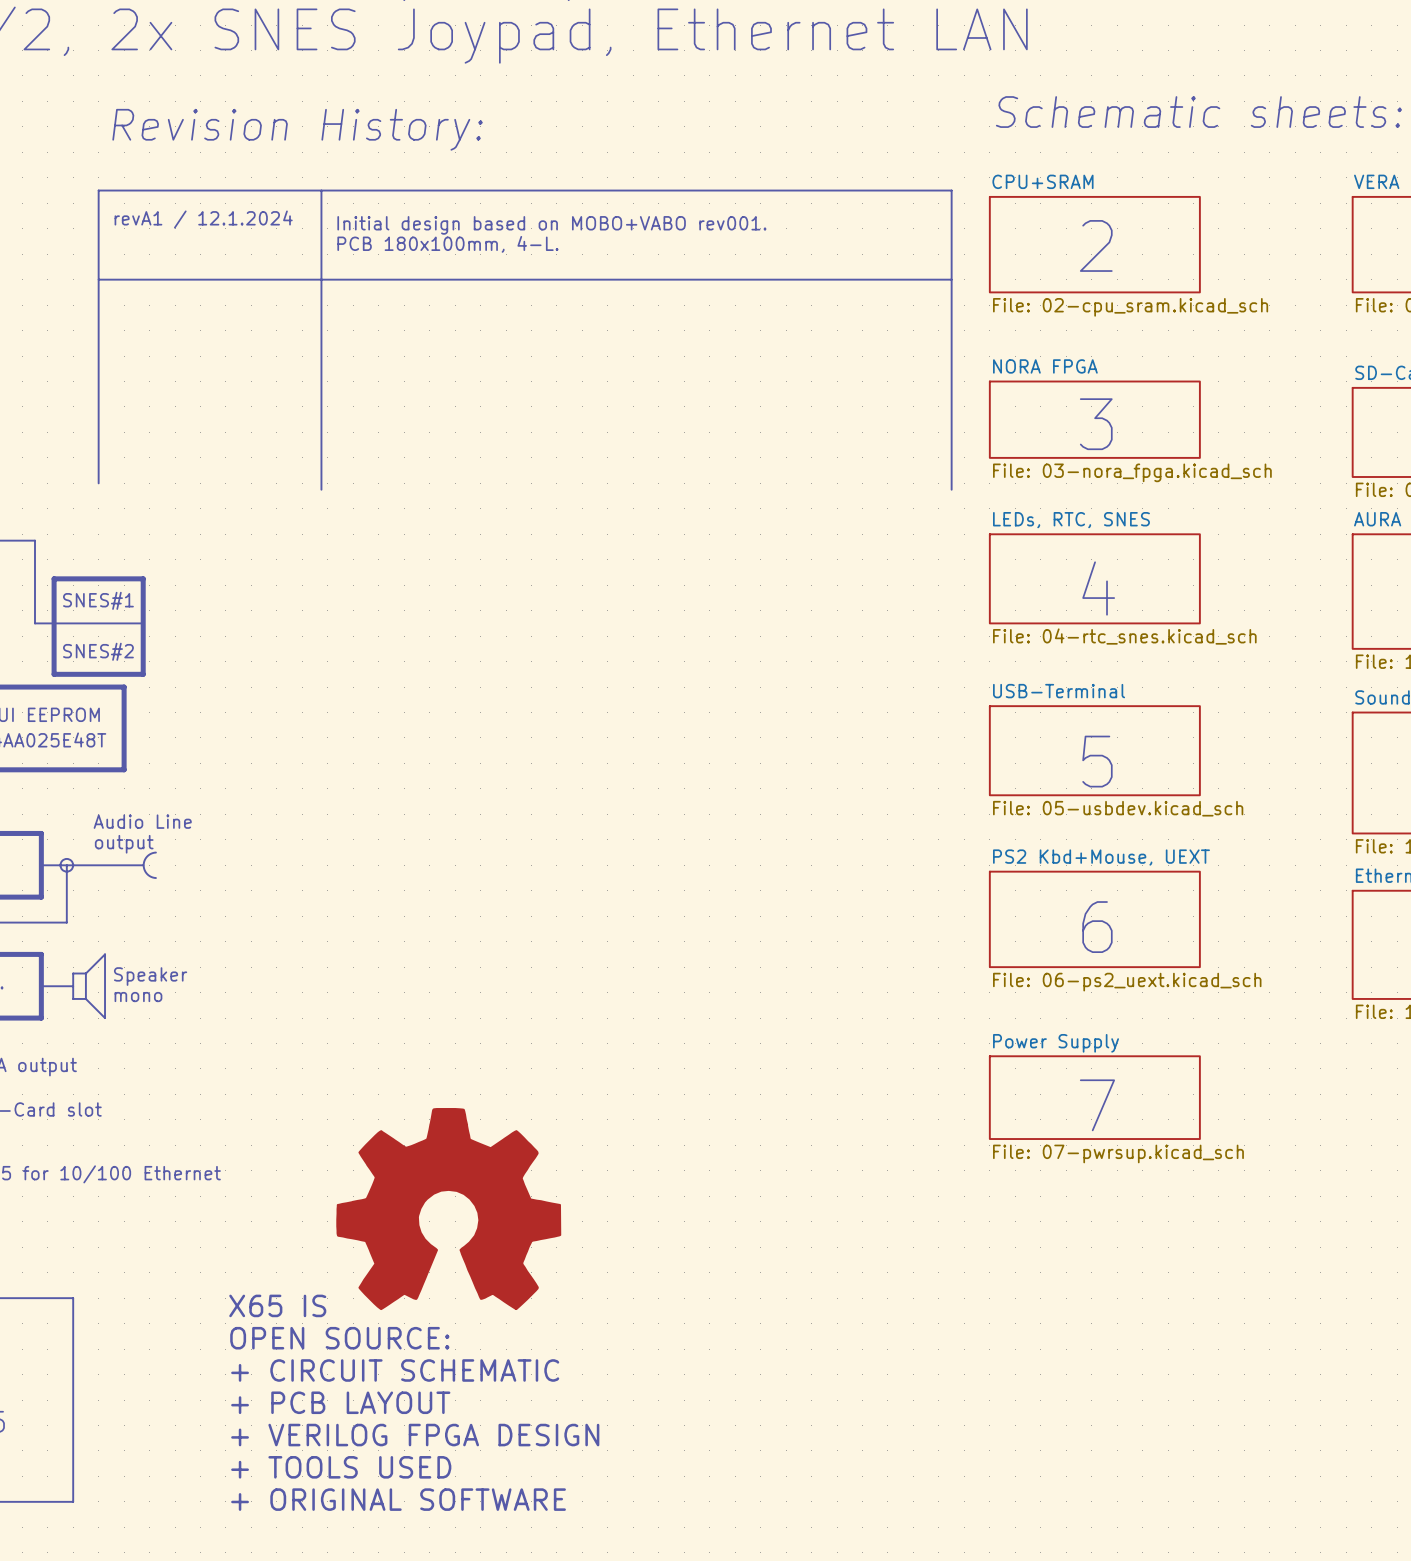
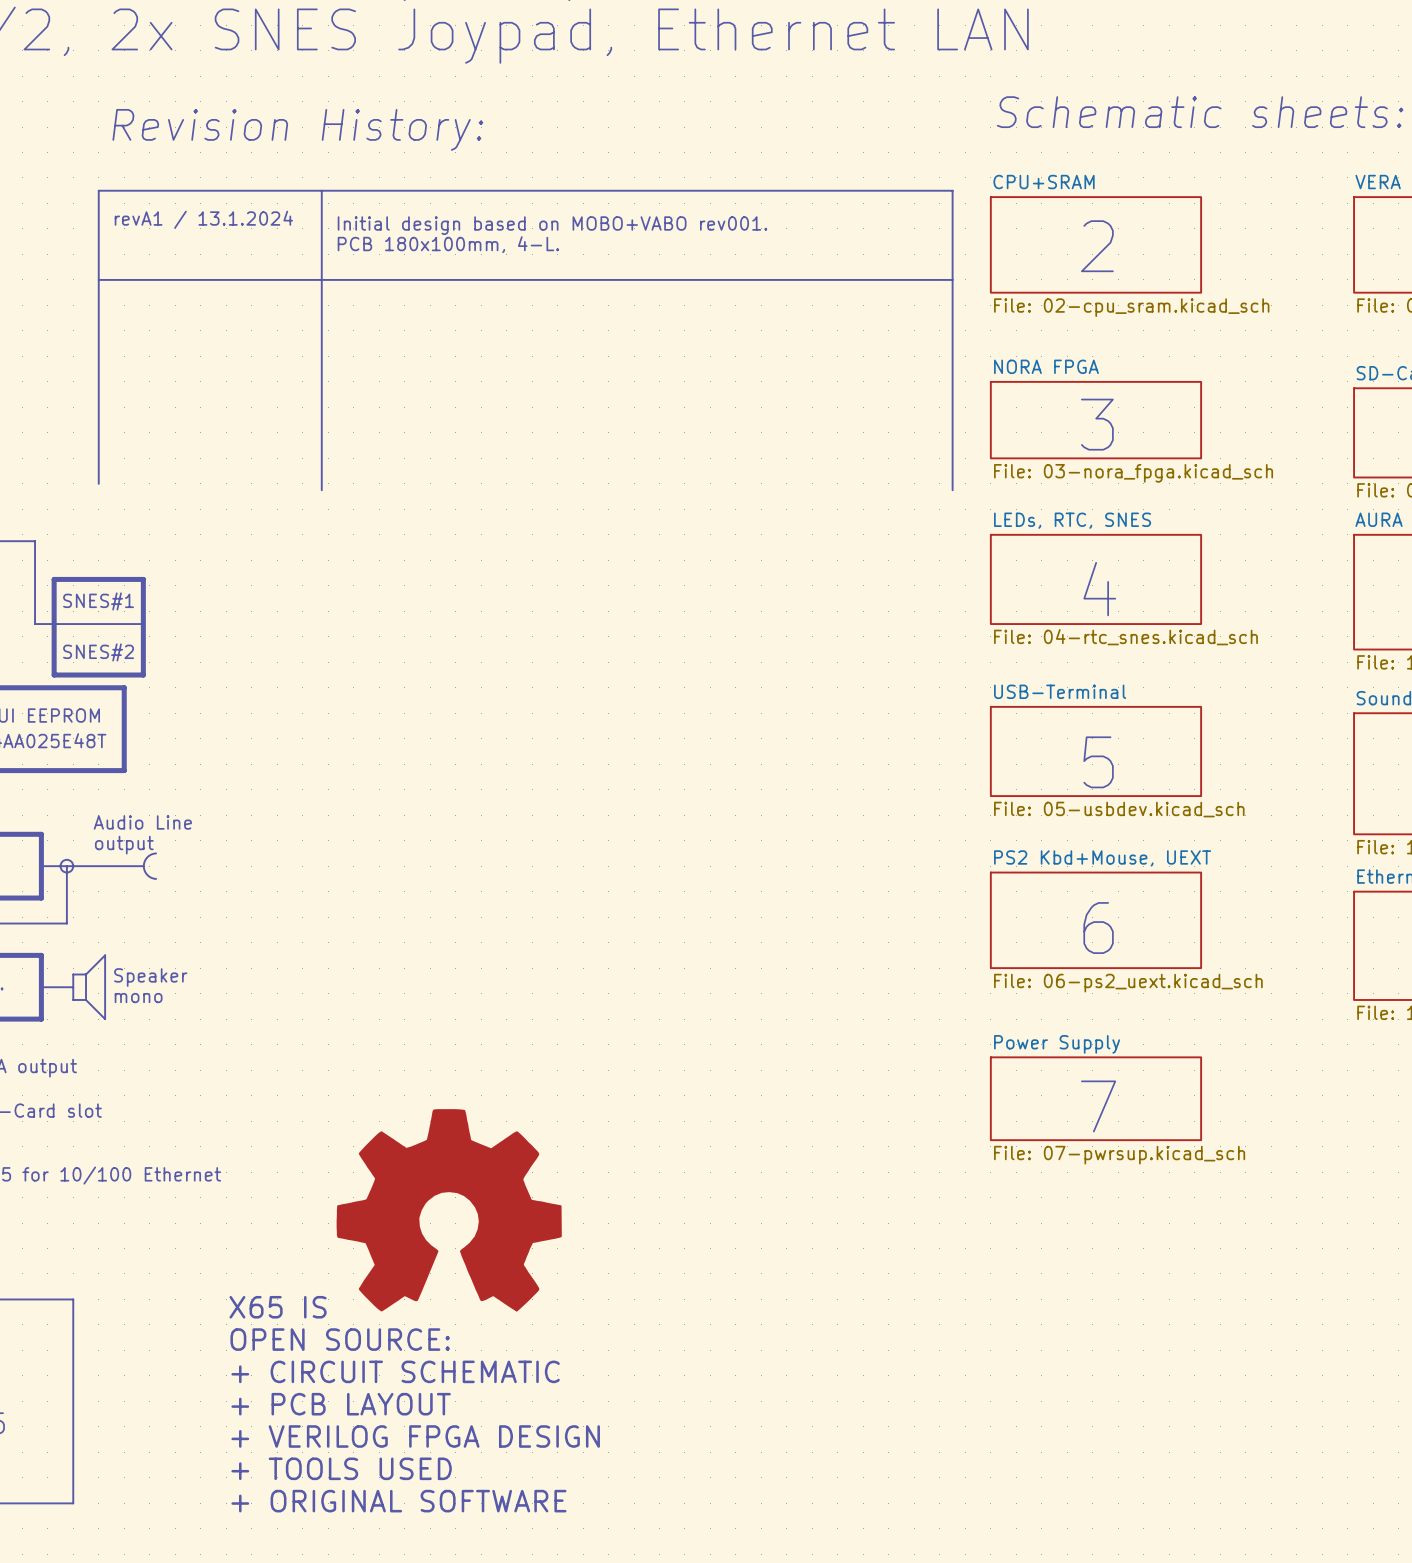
text: revA1 / 12.1.2024 (203, 219) -> revA1 / 13.1.2024 (203, 219)

